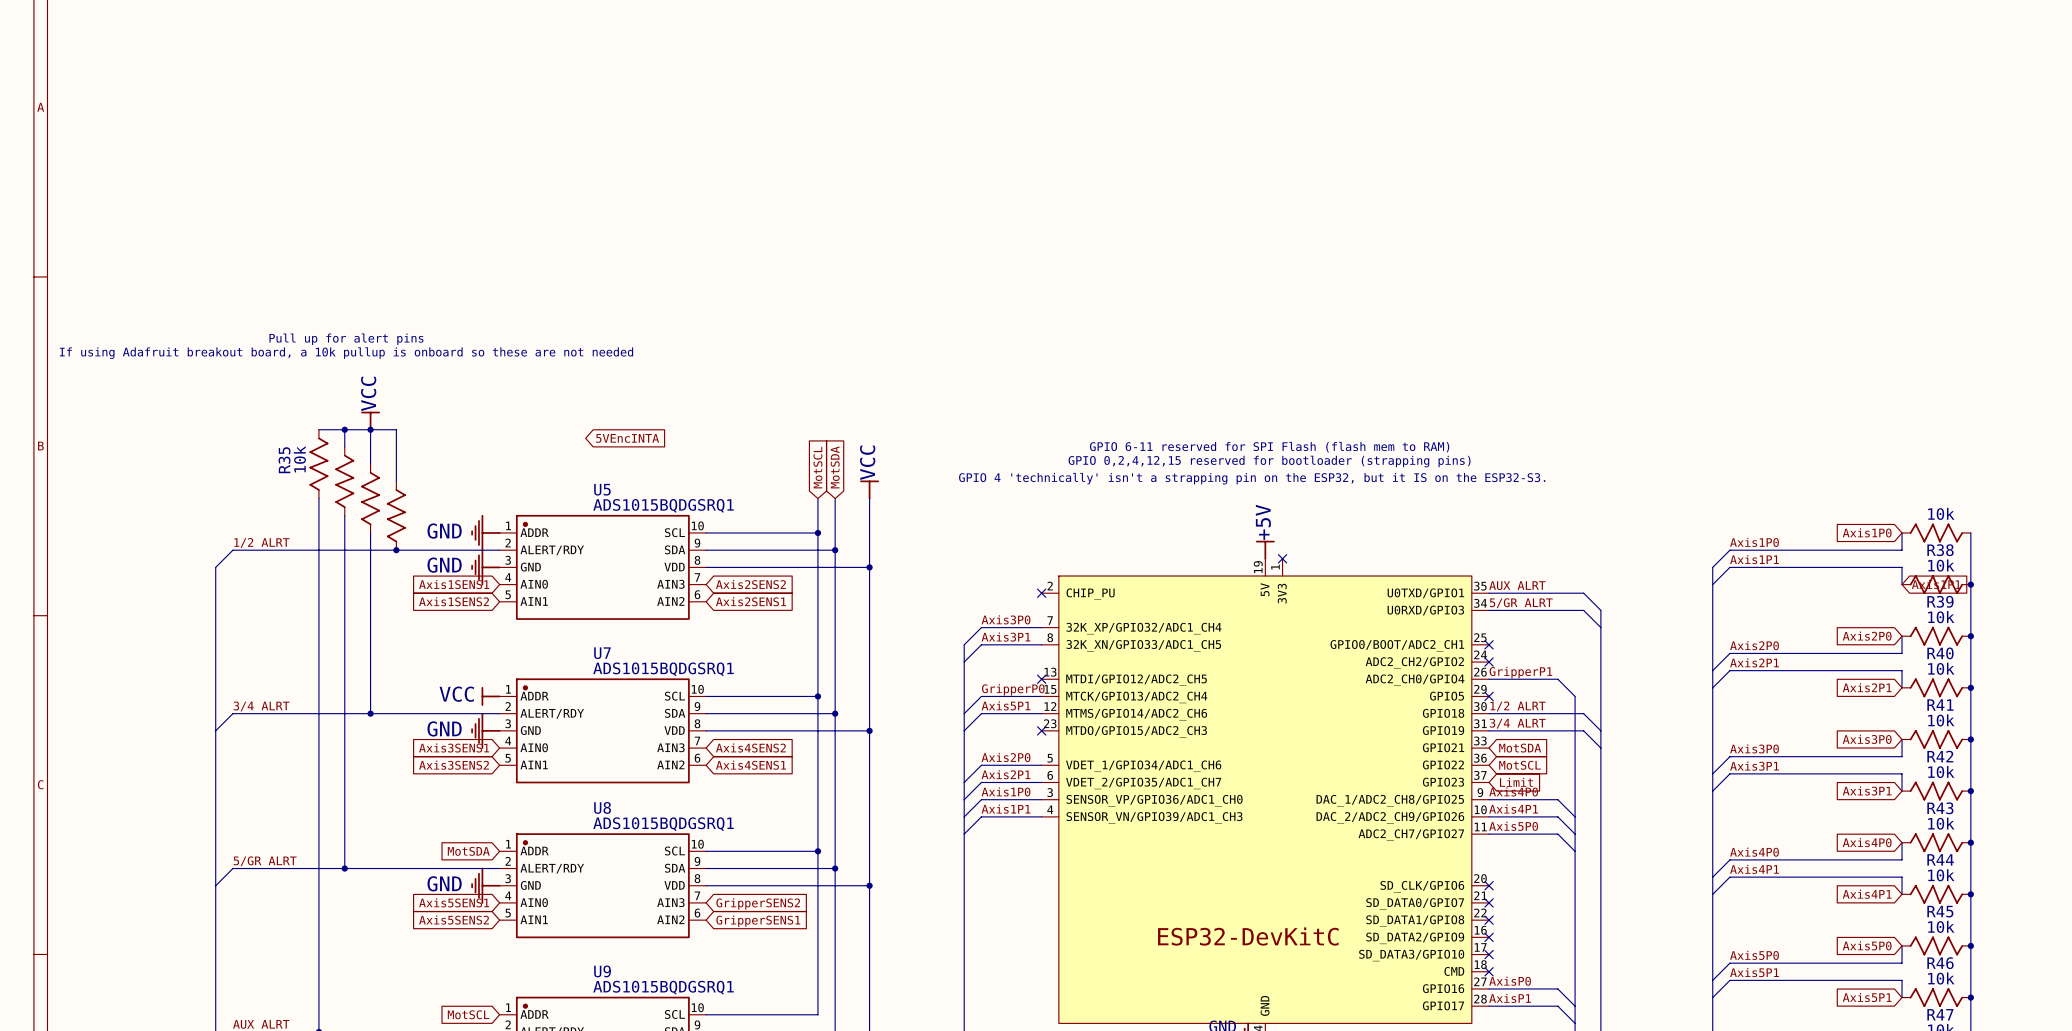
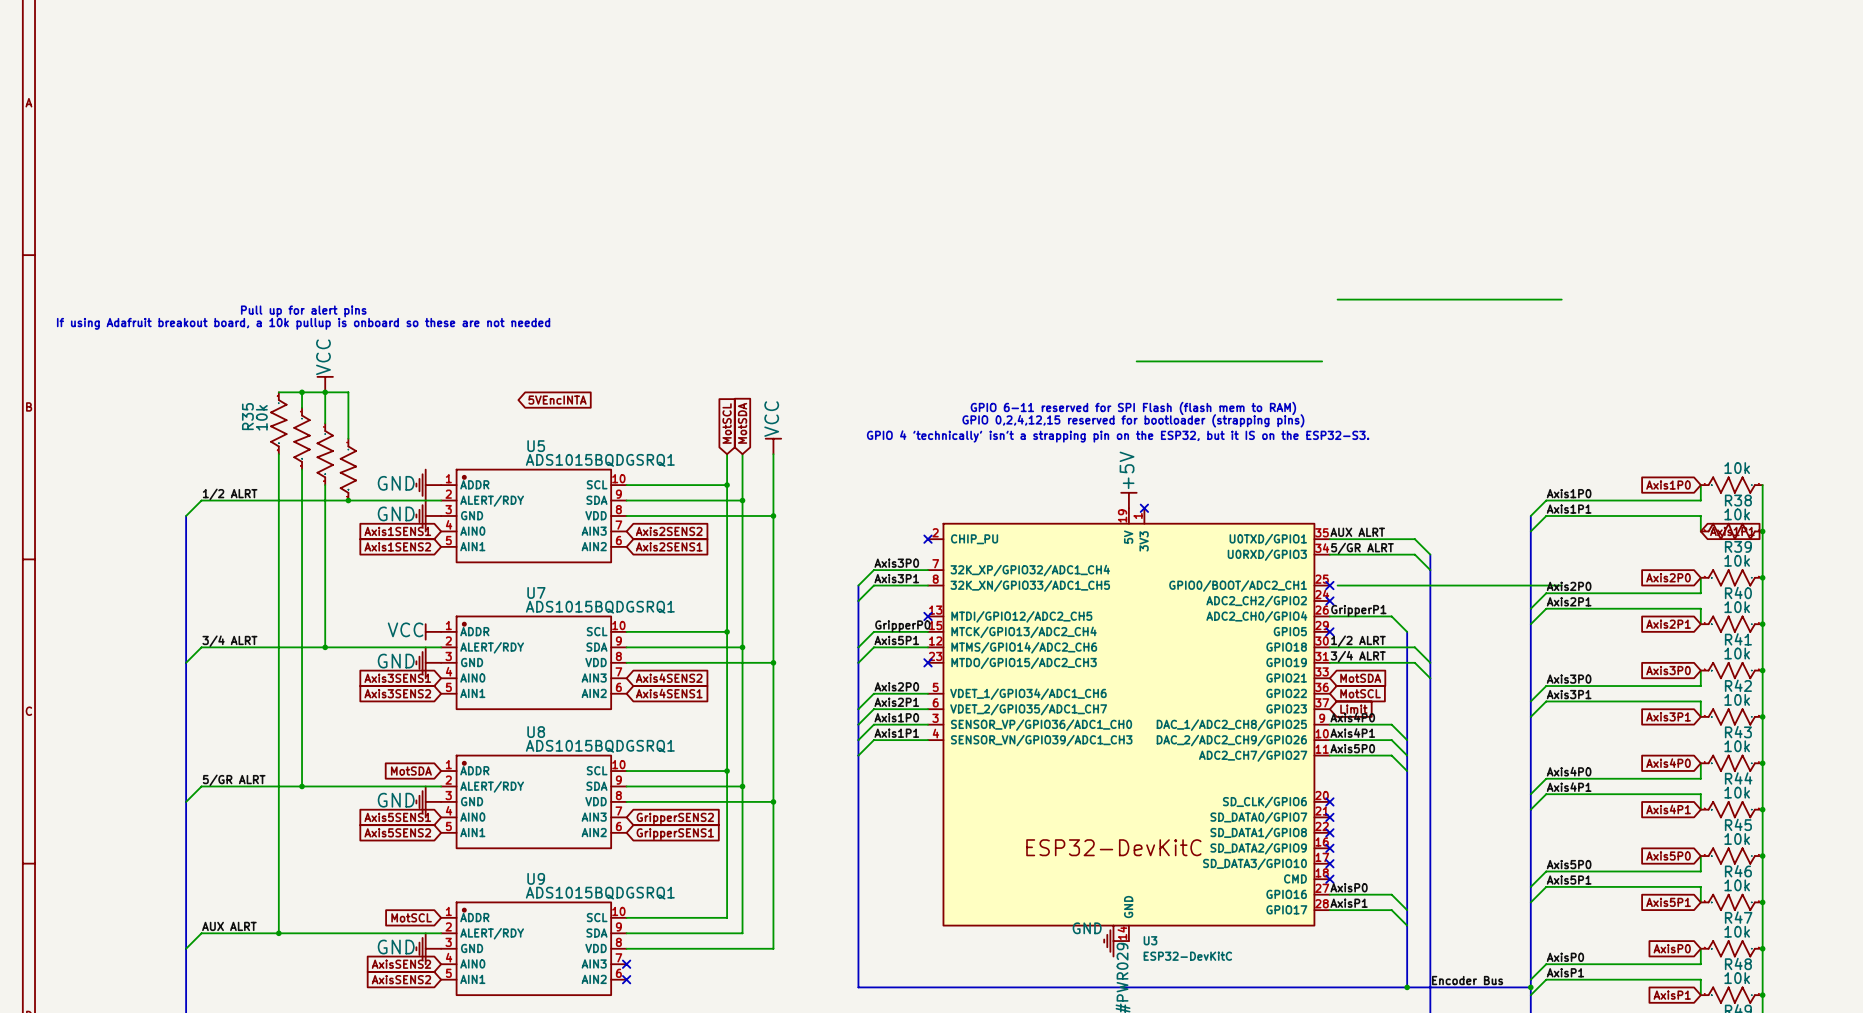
wire: none -> (1337, 299) (1561, 299)
wire: none -> (1136, 361) (1322, 361)
wire: none -> (1337, 585) (1561, 585)

